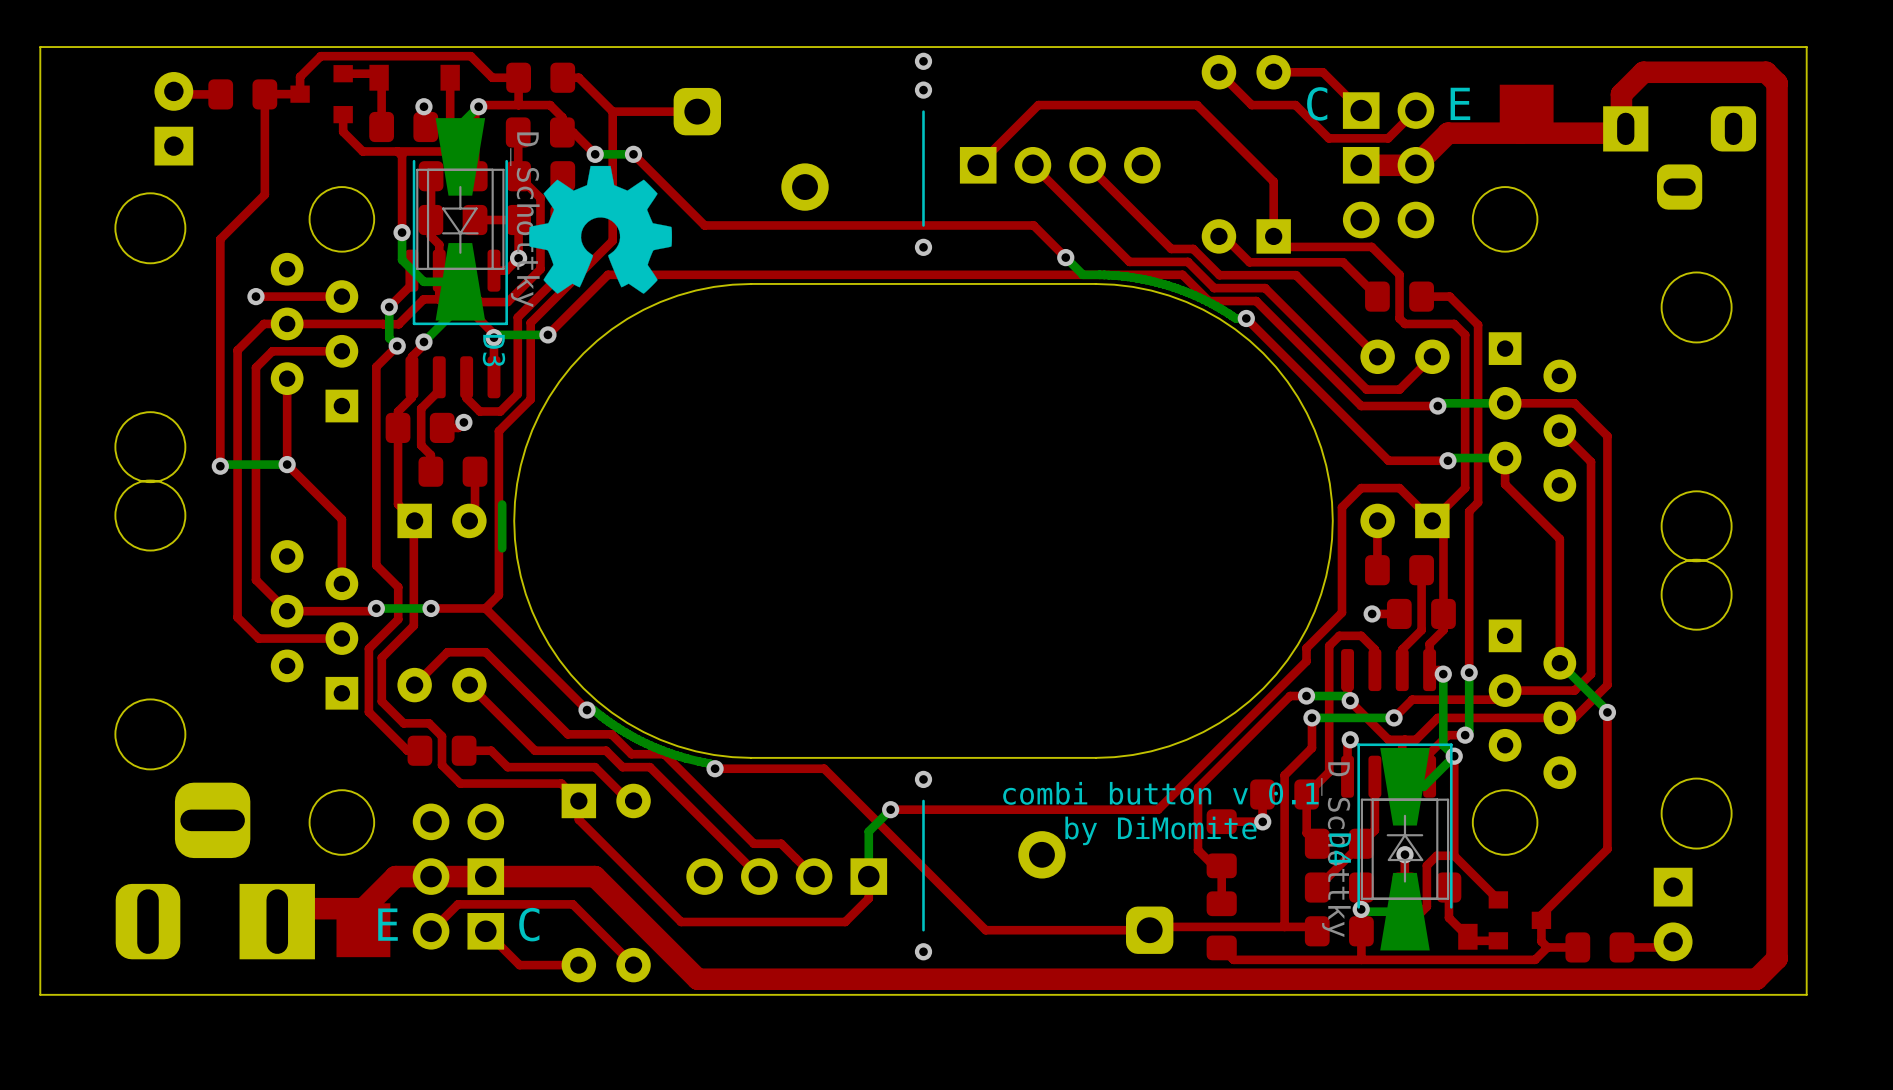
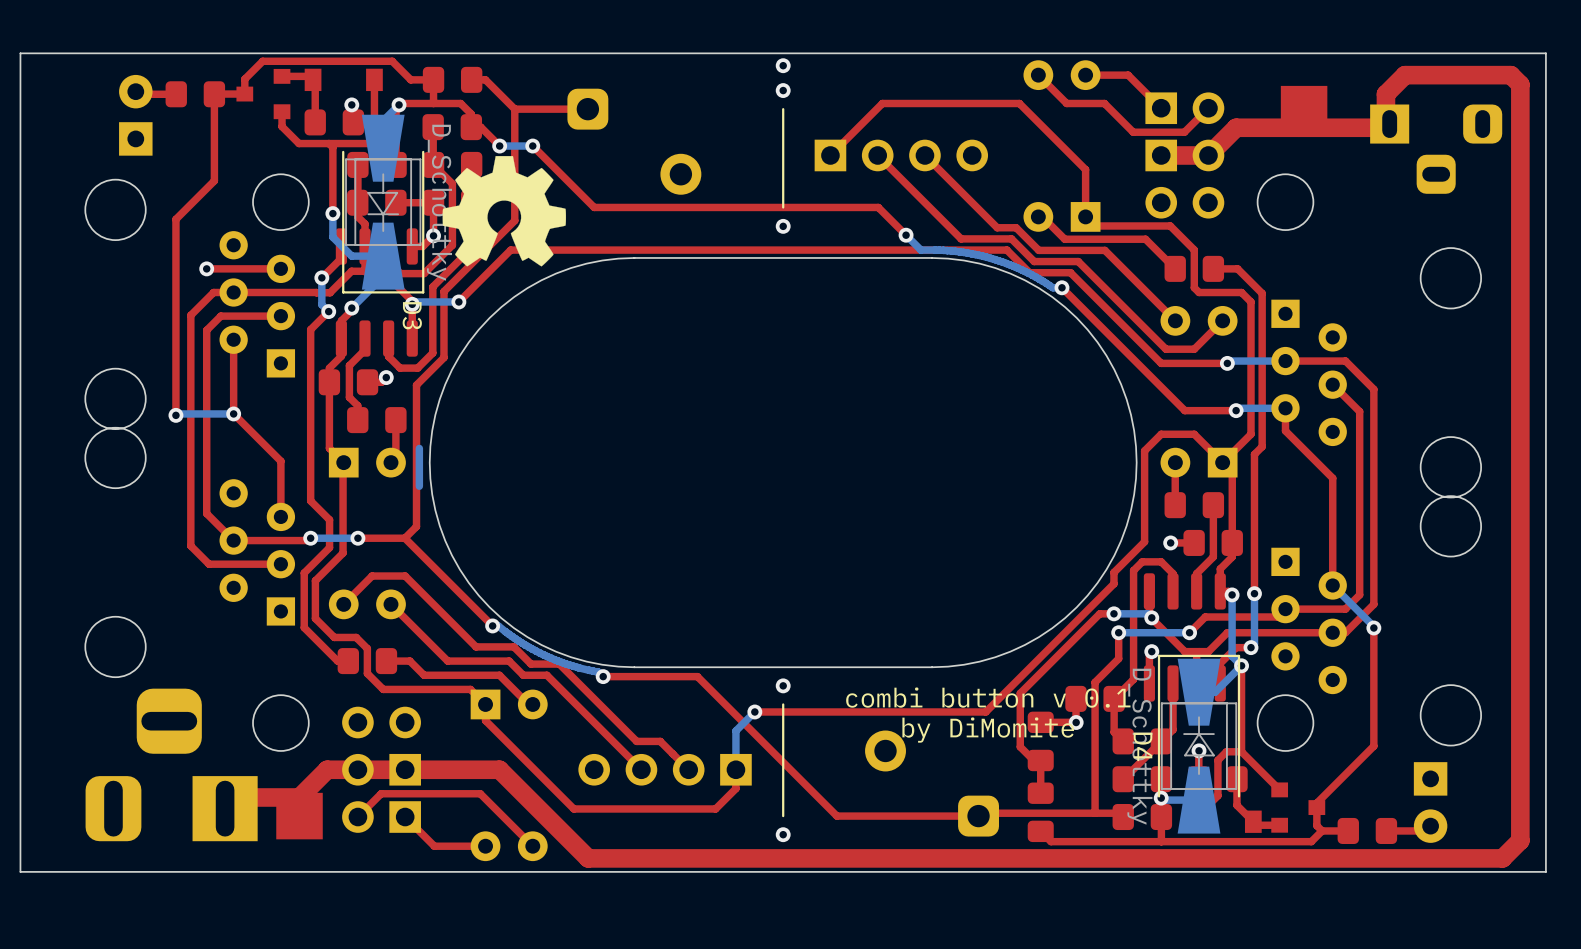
text: C (1317, 103) -> none
text: E (1460, 103) -> none
text: E (388, 924) -> none
text: C (529, 924) -> none

